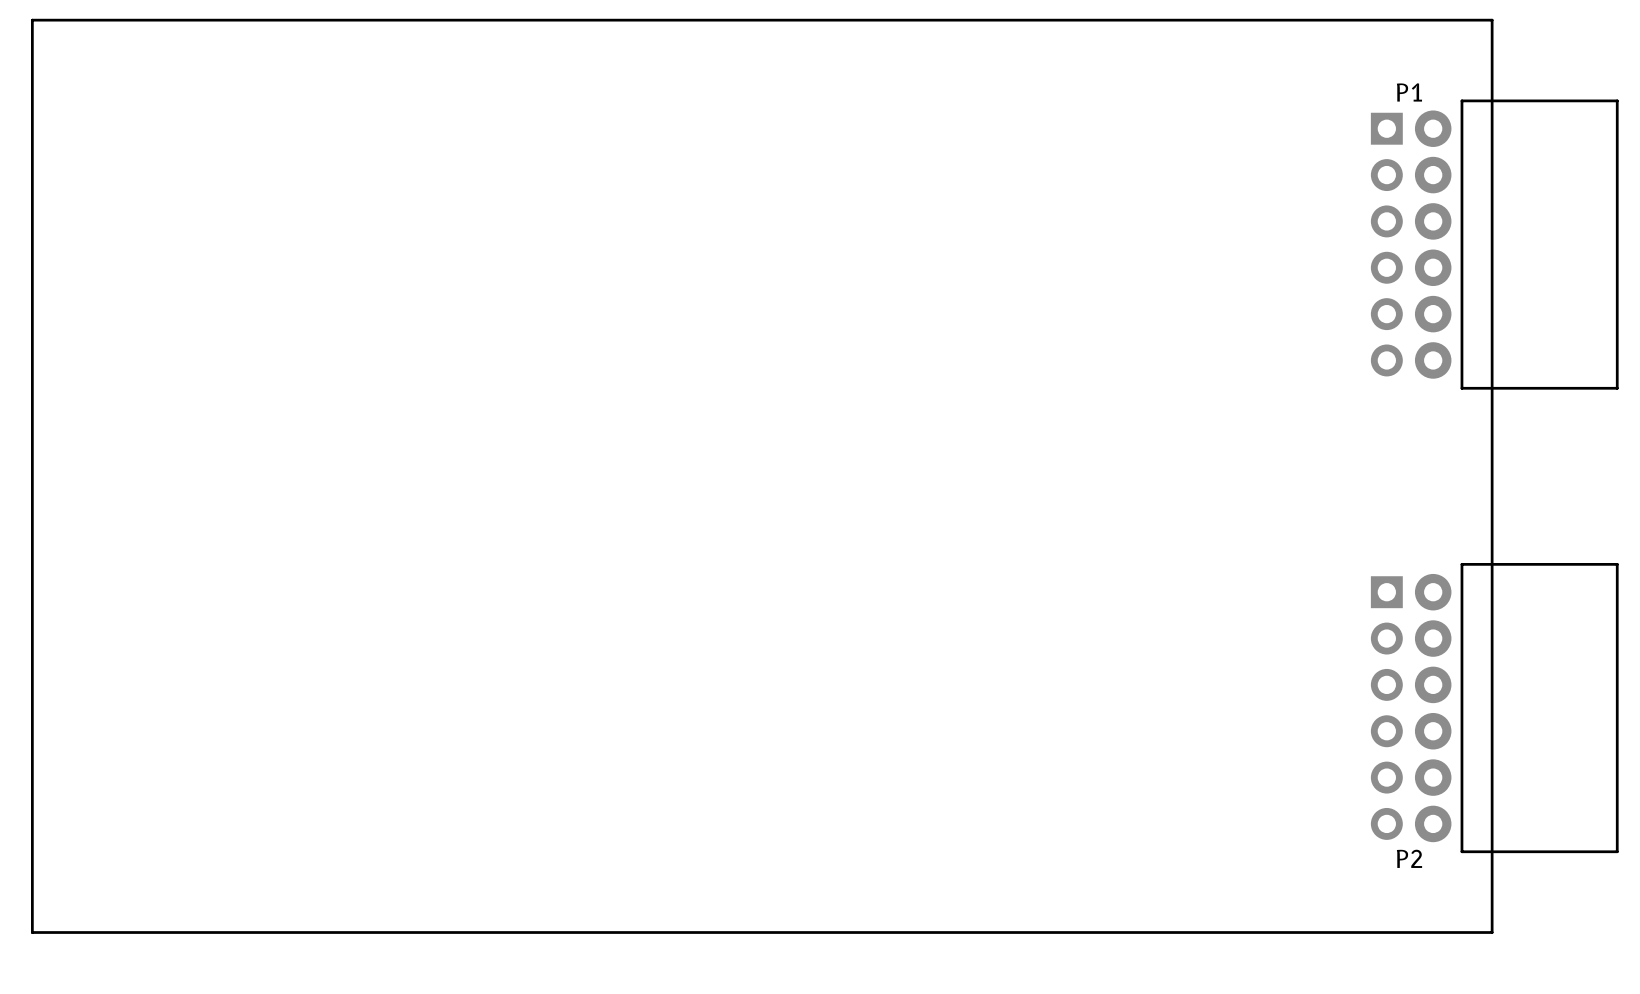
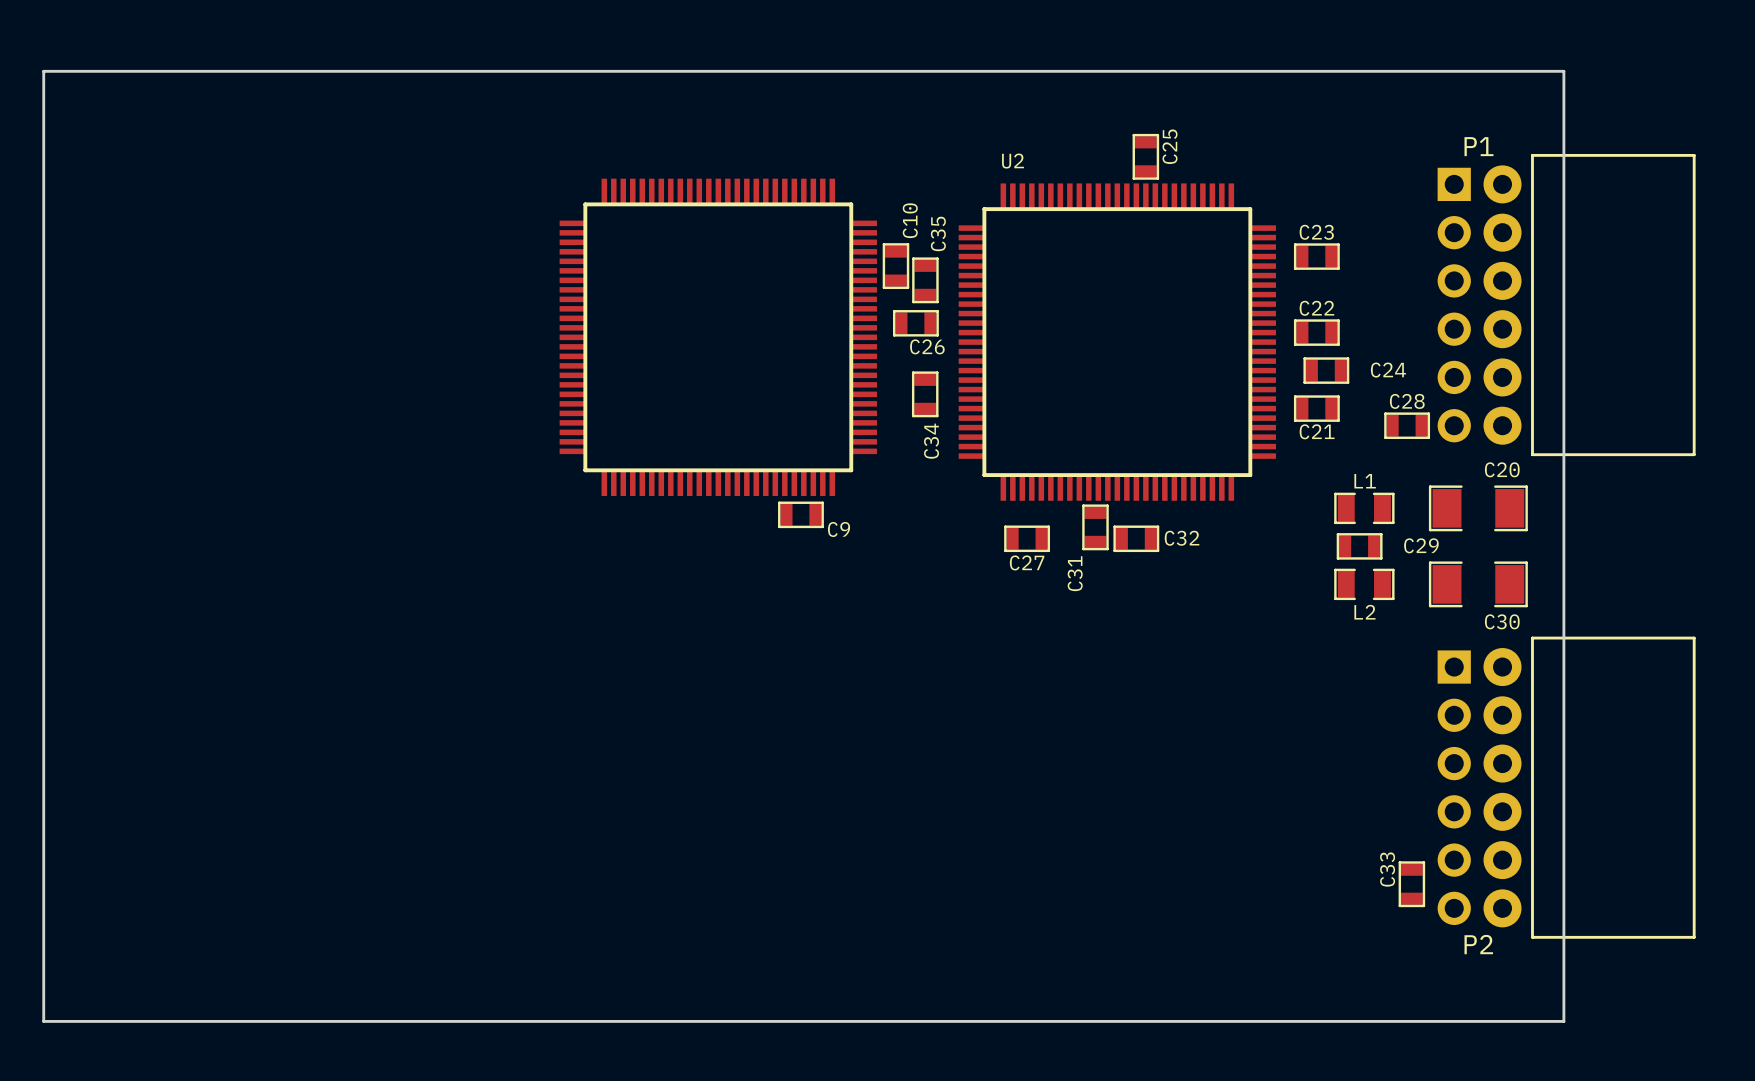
C25: none -> (1145, 156)
C23: none -> (1316, 256)
C10: none -> (895, 266)
C35: none -> (925, 280)
C26: none -> (915, 323)
C22: none -> (1316, 332)
part: none -> (718, 337)
U2: none -> (1117, 342)
C24: none -> (1326, 370)
C34: none -> (925, 394)
C21: none -> (1316, 408)
C28: none -> (1407, 425)
L1: none -> (1364, 508)
C20: none -> (1478, 508)
C9: none -> (800, 514)
C31: none -> (1095, 527)
C27: none -> (1027, 538)
C32: none -> (1136, 538)
C29: none -> (1359, 546)
L2: none -> (1364, 584)
C30: none -> (1478, 584)
C33: none -> (1411, 884)

